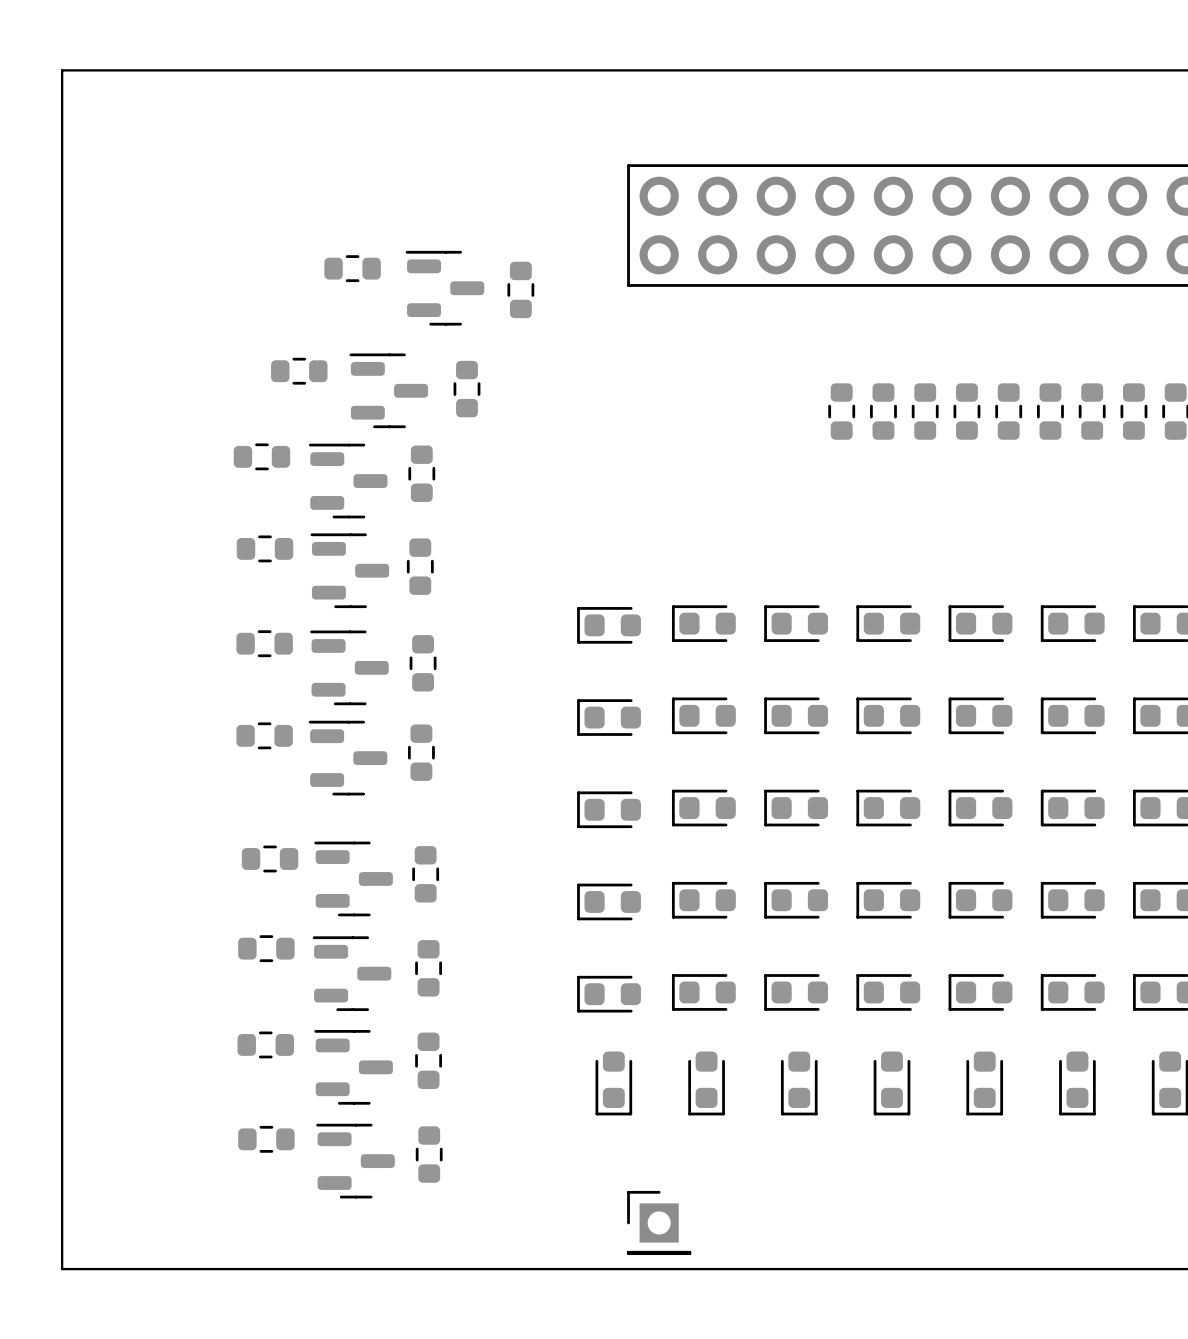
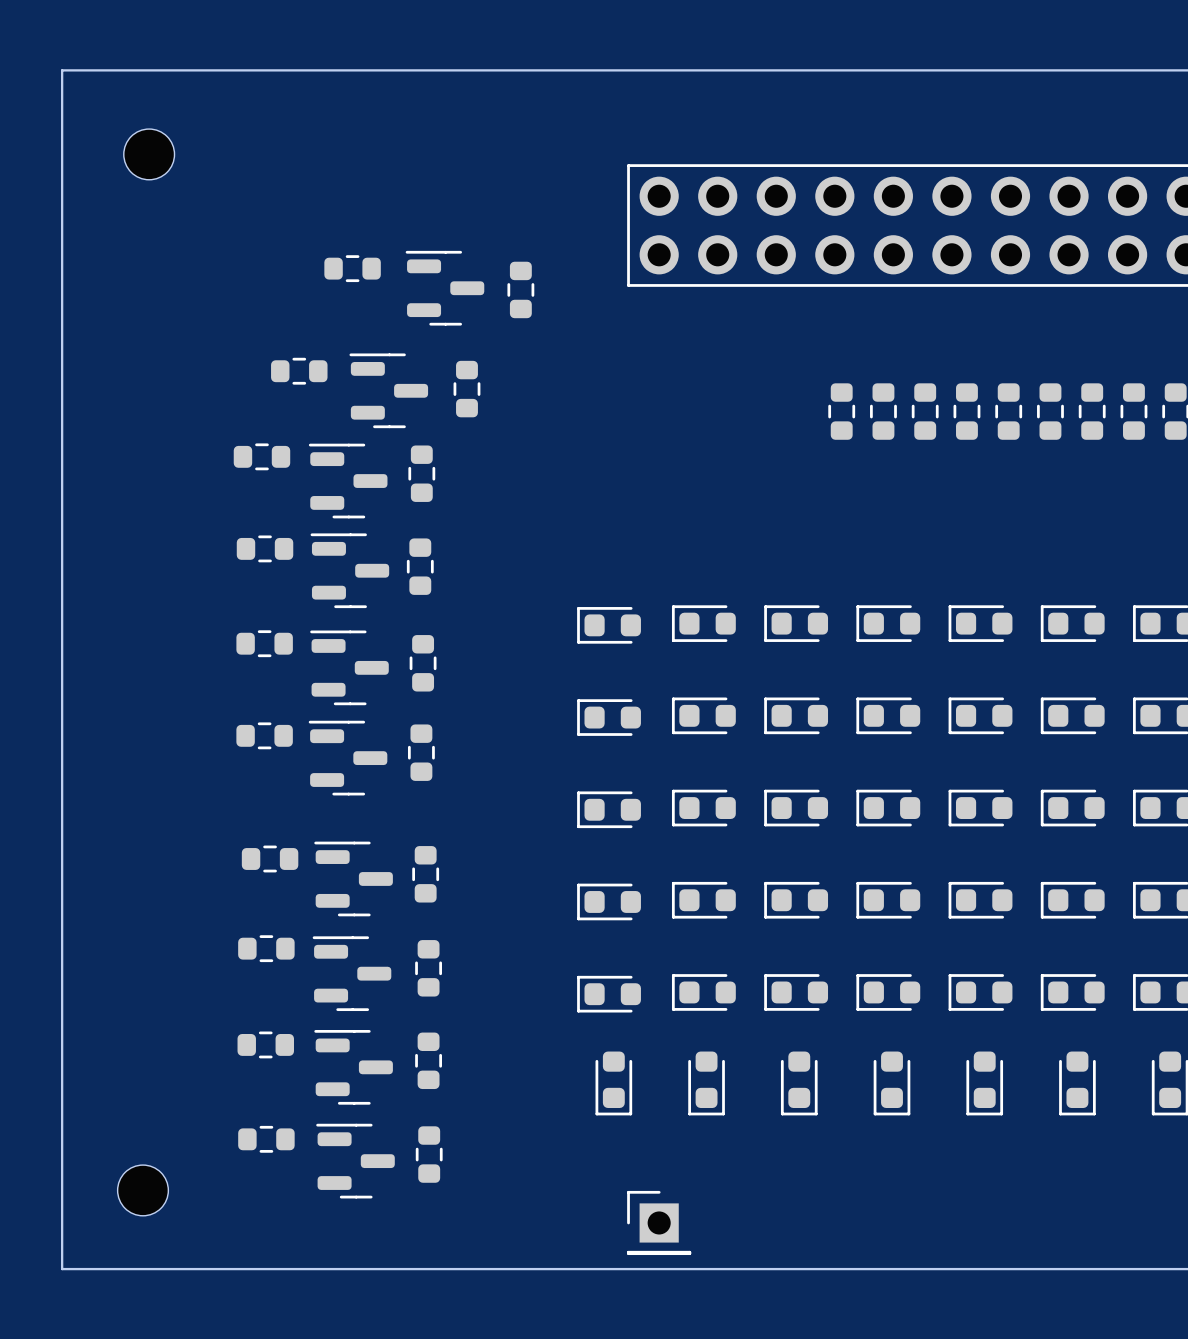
part: none -> (149, 154)
part: none -> (142, 1190)

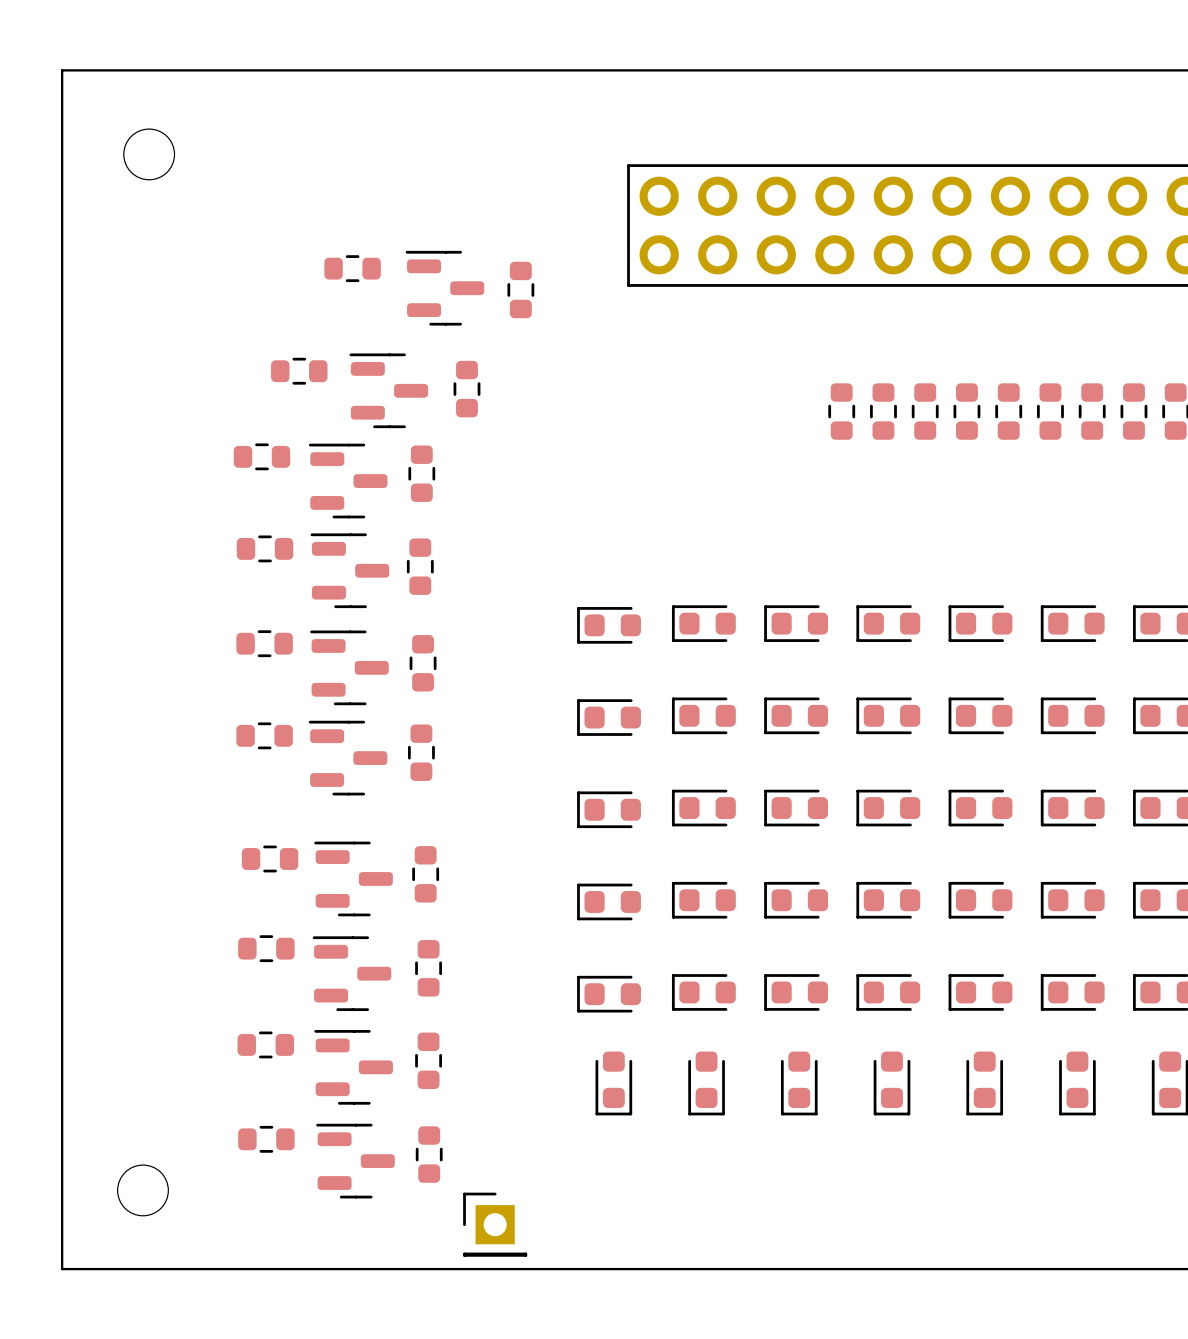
part position: (659, 1222) -> (495, 1224)

